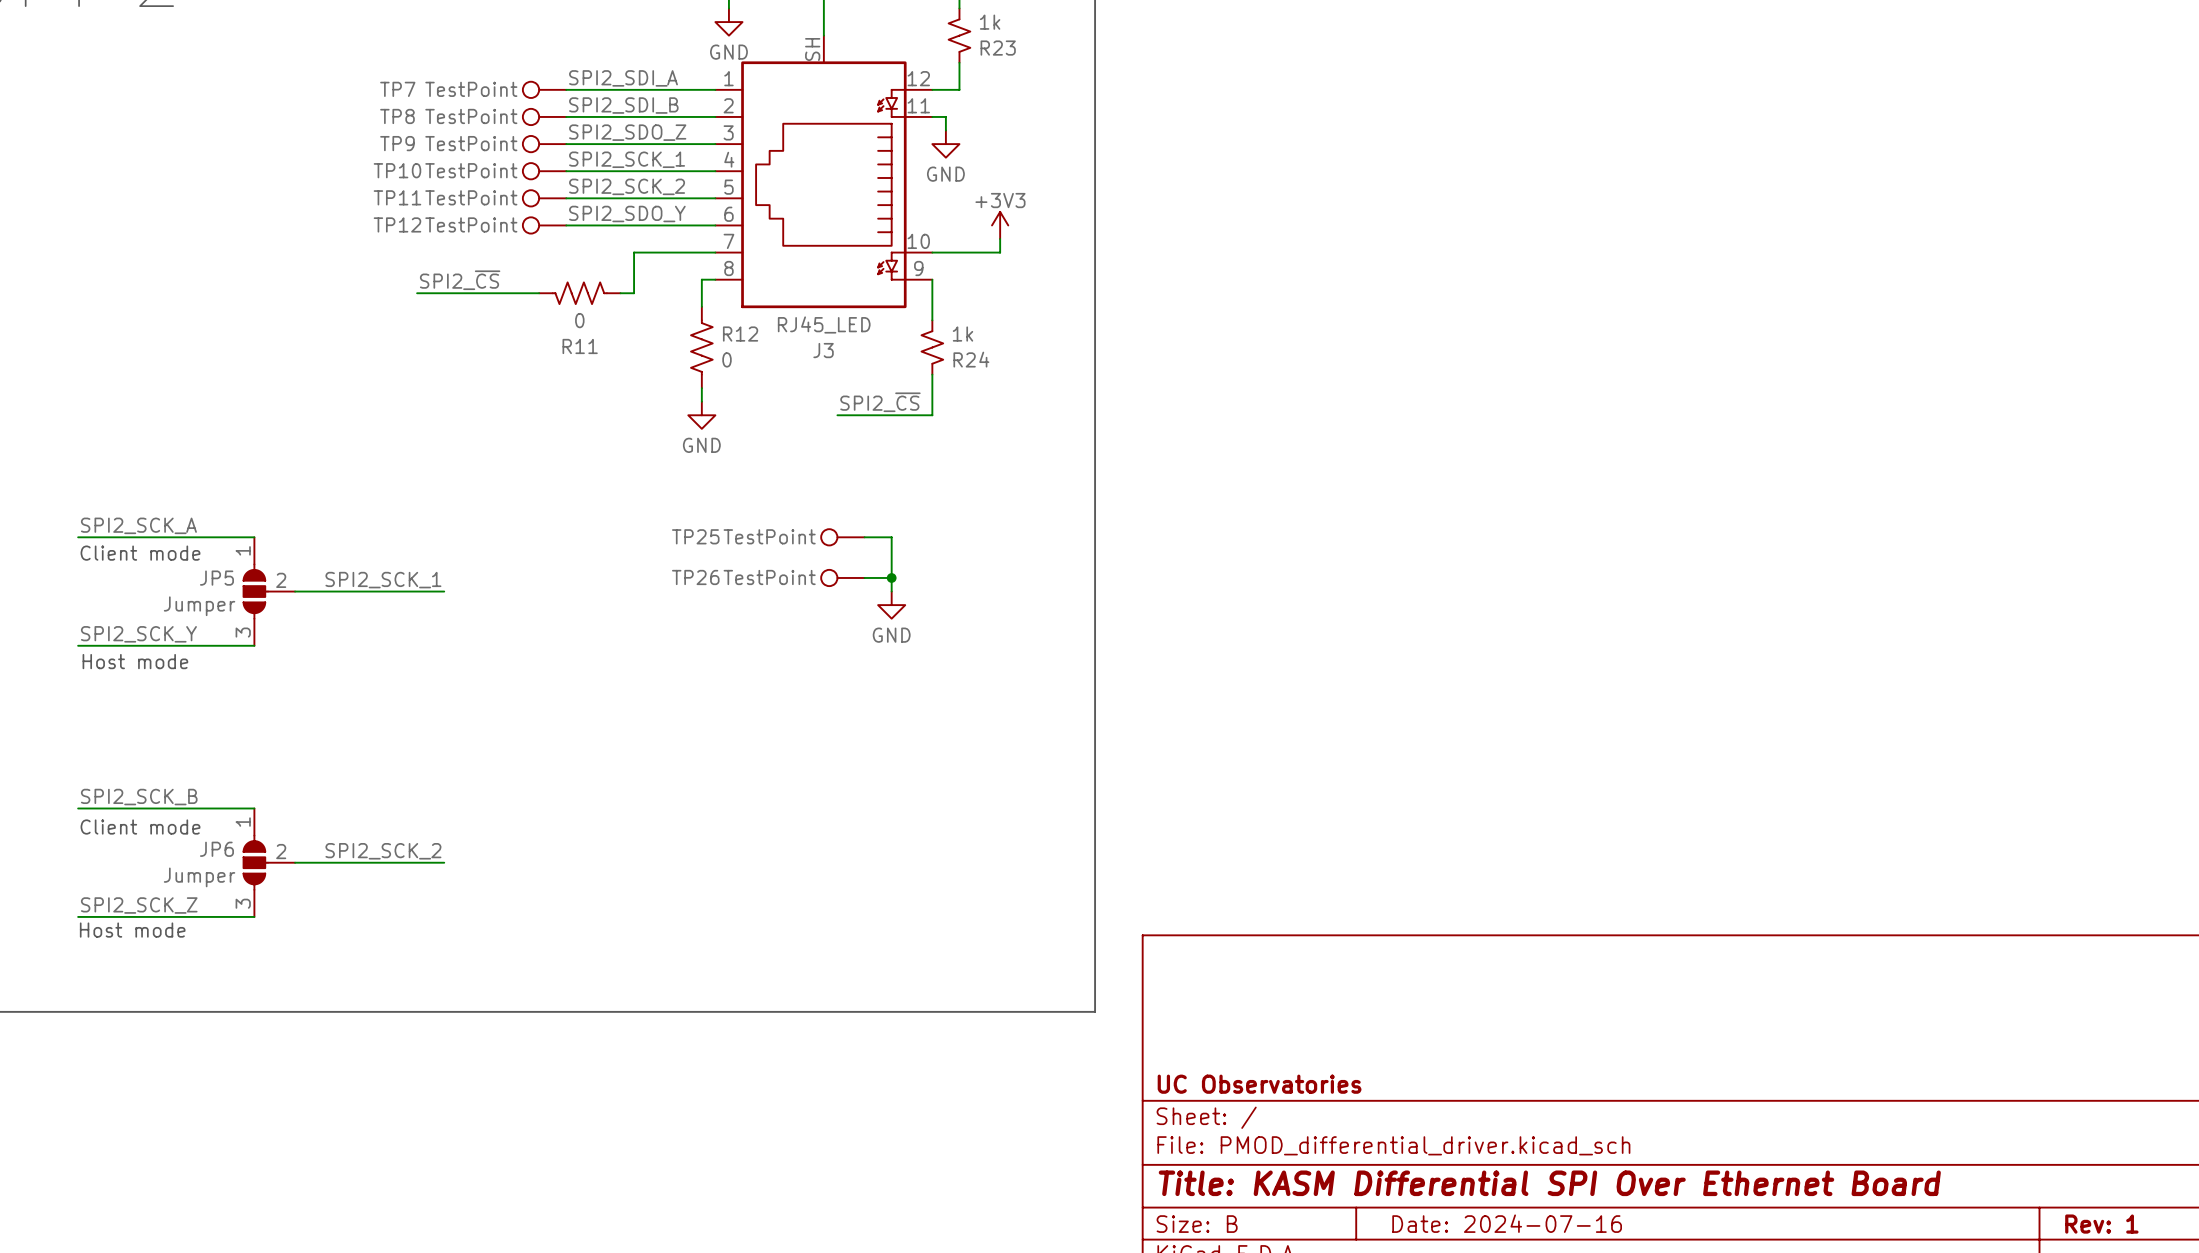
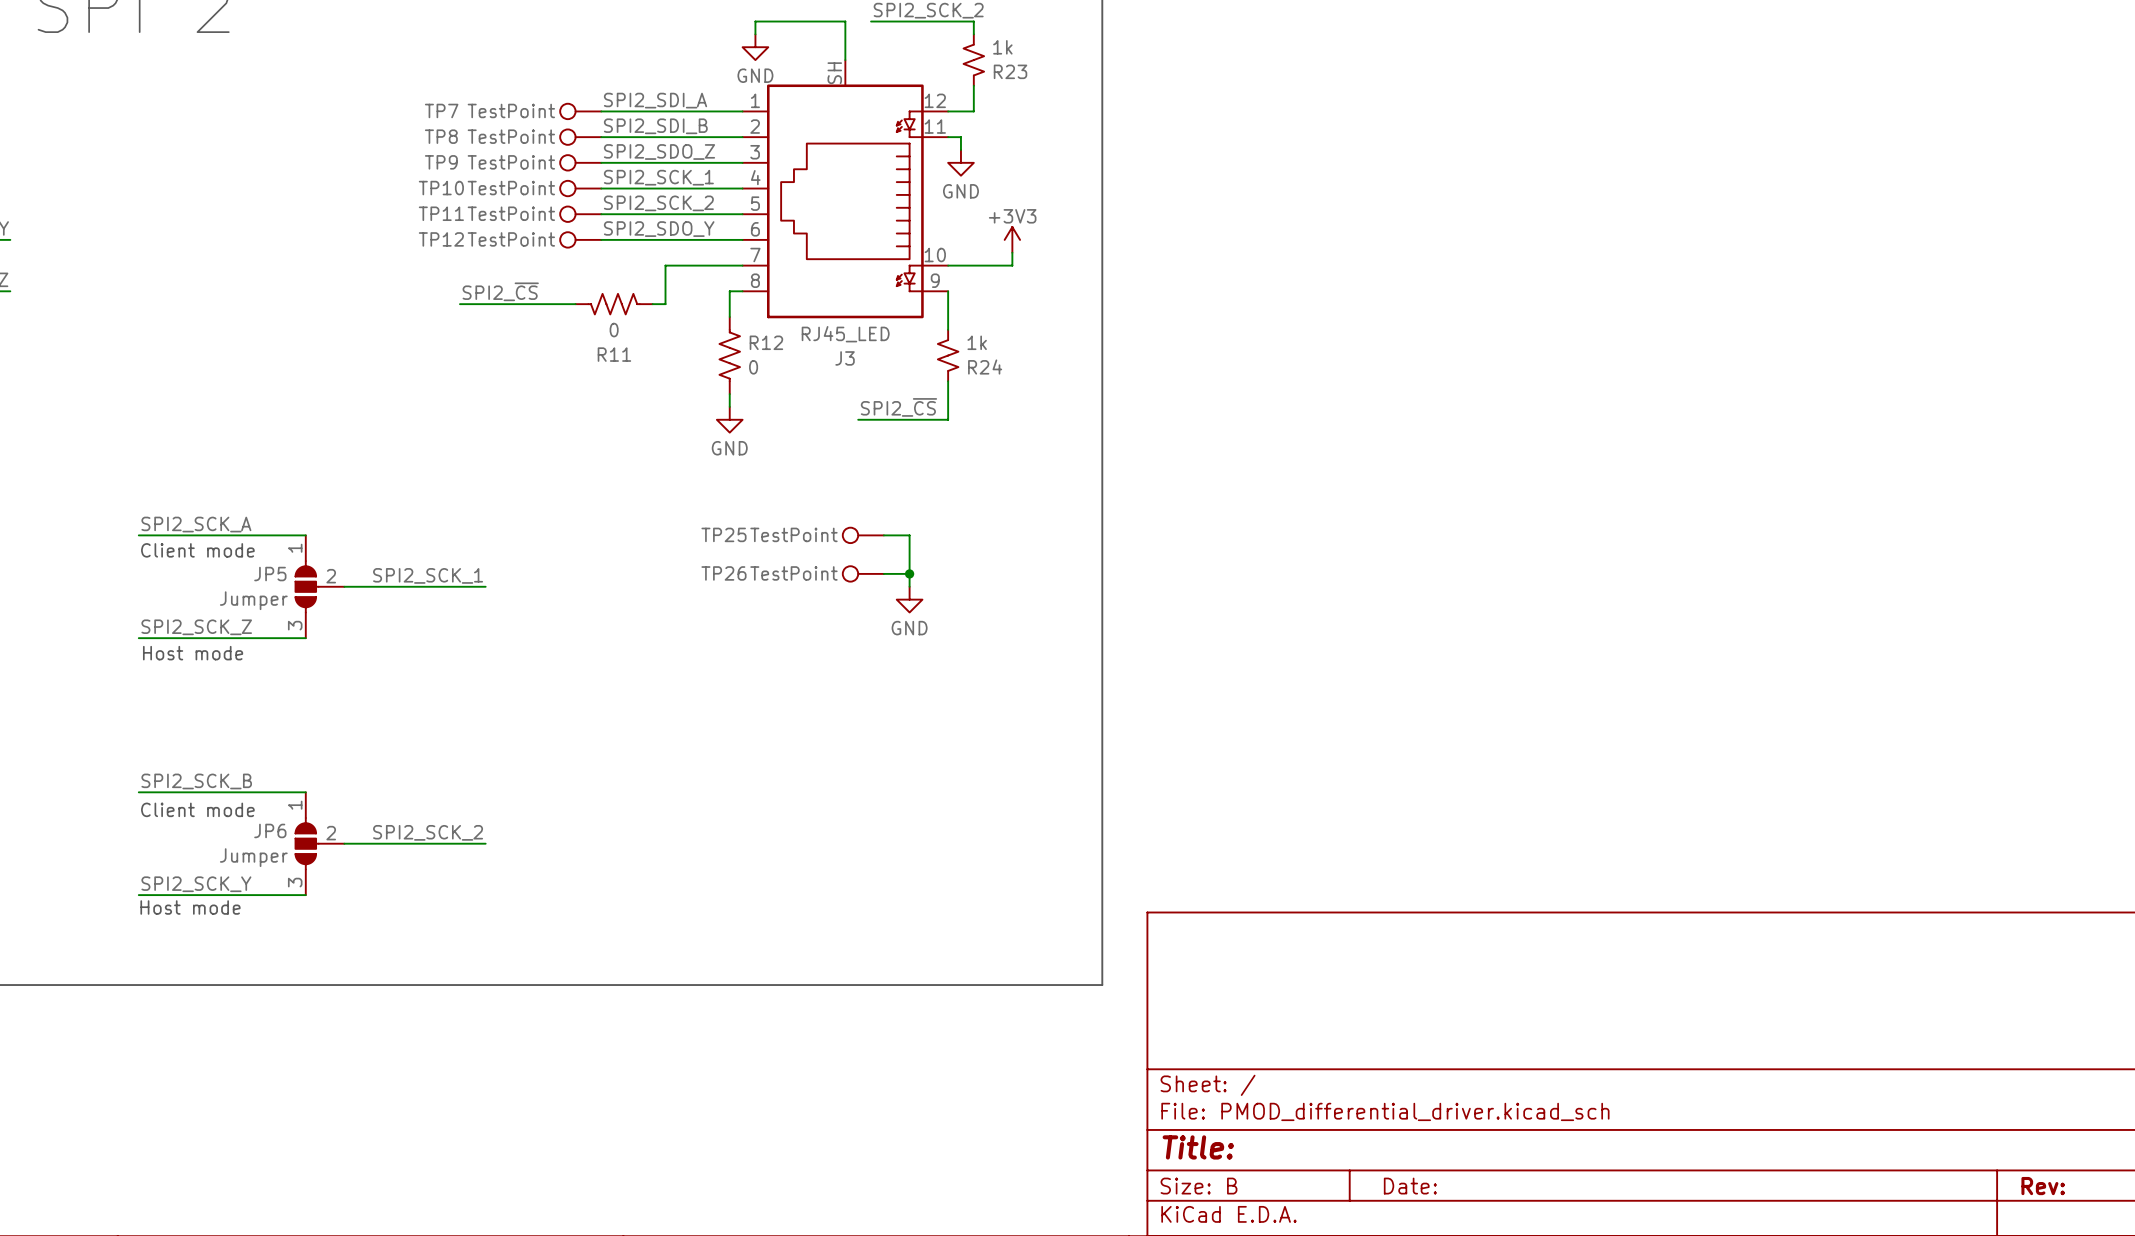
label: SPI2_SCK_Y (138, 634) -> SPI2_SCK_Z (196, 627)
label: SPI2_SCK_Z (139, 905) -> SPI2_SCK_Y (196, 884)
title block: UC Observatories (1259, 1084) -> none
title block: Title: KASM Differential SPI Over Ethernet Board (1549, 1183) -> Title: (1198, 1147)
title block: Date: 2024-07-16 (1507, 1223) -> Date: (1410, 1186)
title block: Rev: 1 (2101, 1224) -> Rev: (2043, 1186)

